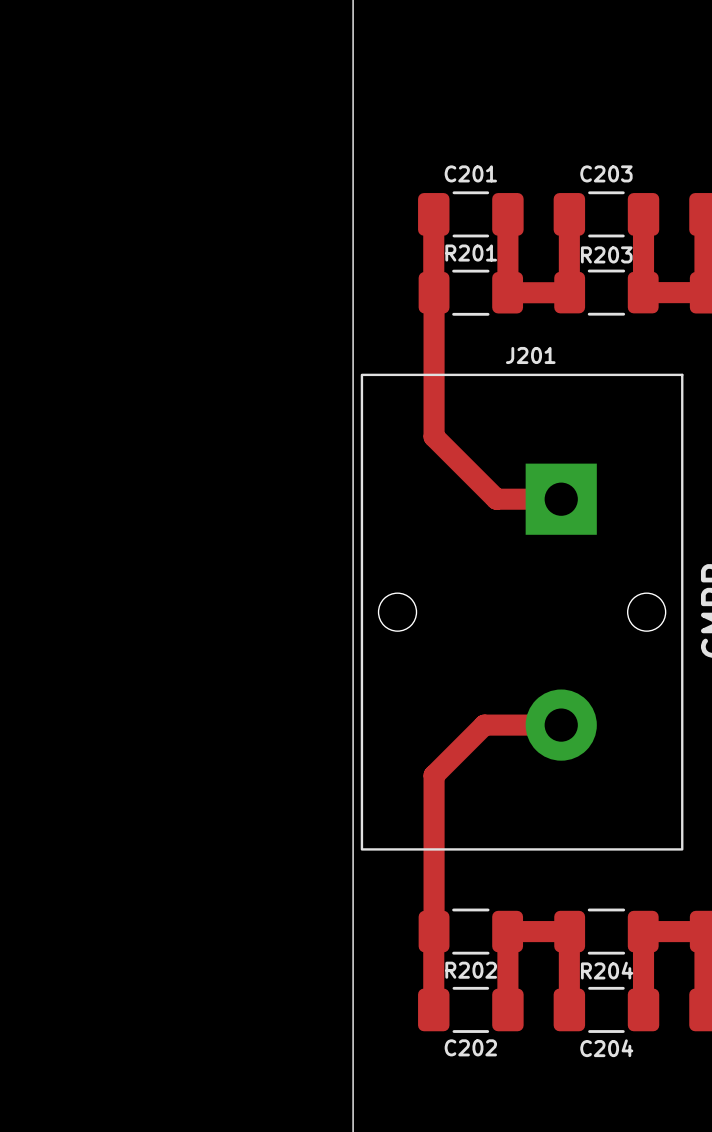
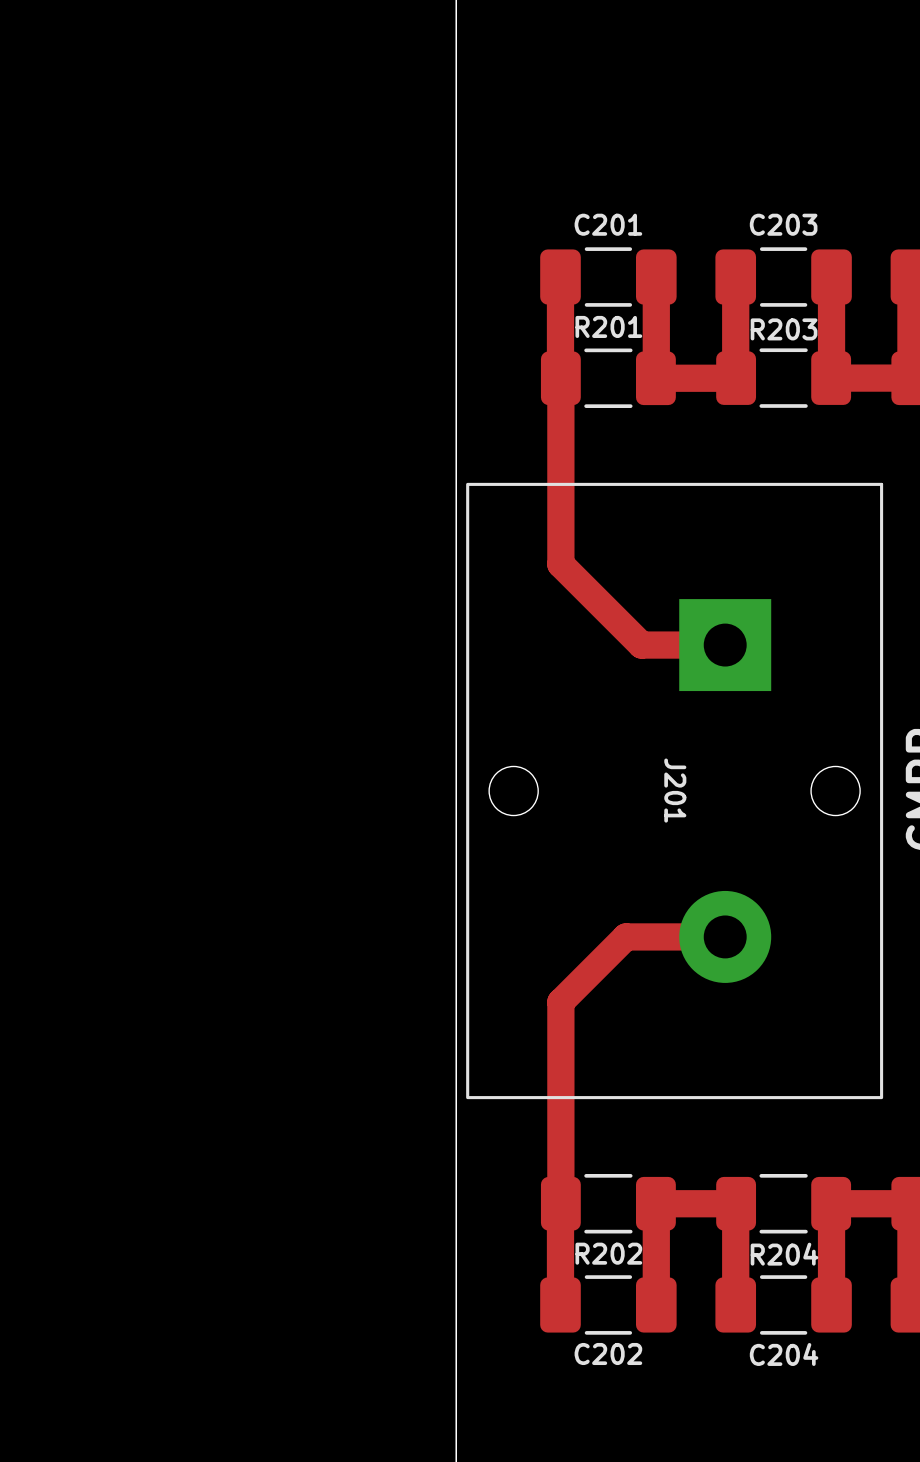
J201 name rotation: 0° (530, 355) -> 90° clockwise (675, 790)
J201 name position: J201 (530, 355) -> J201 (675, 790)

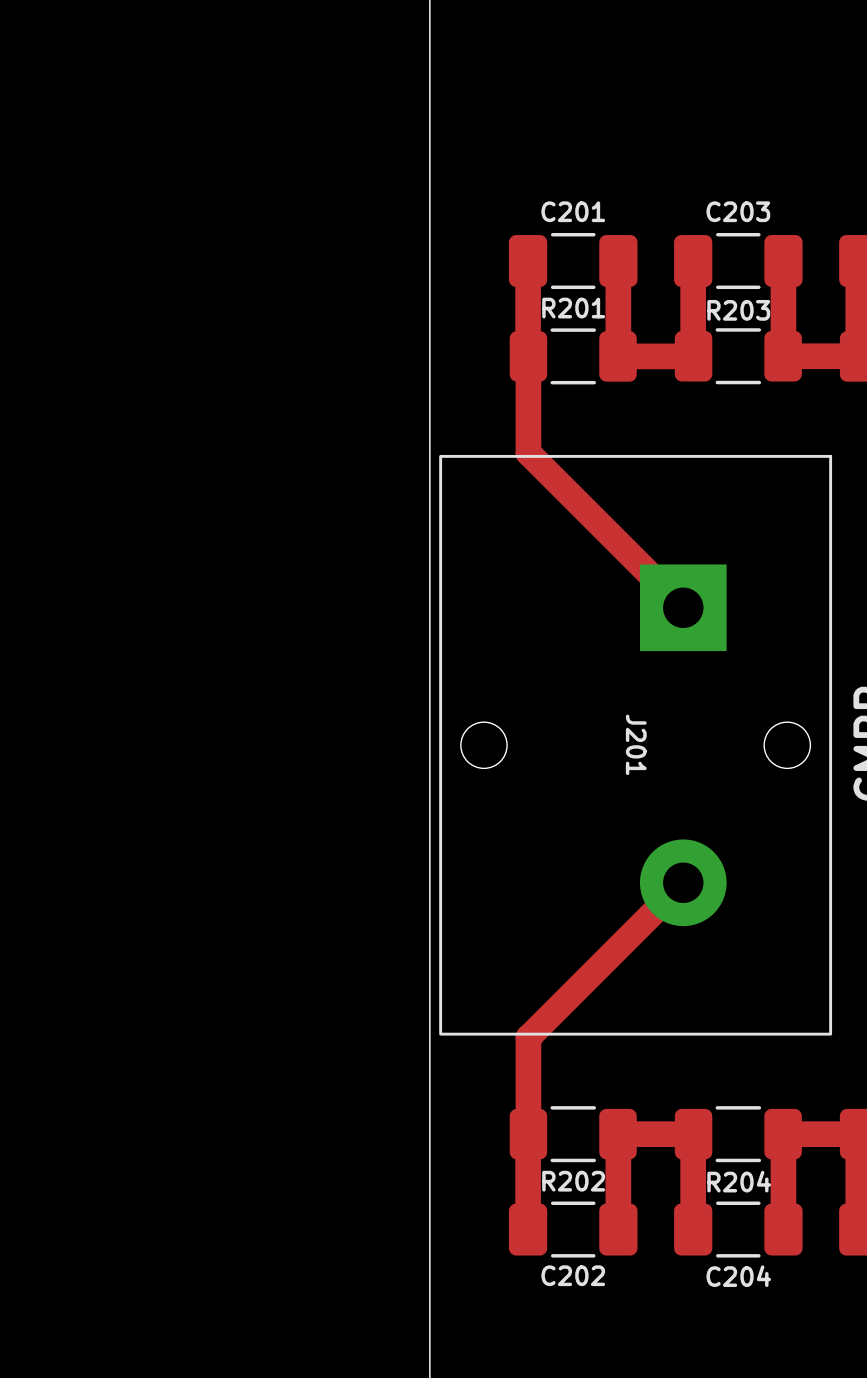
track: (560, 480) (560, 564) (641, 645) (725, 645) -> (528, 452) (683, 607)
track: (725, 936) (626, 936) (560, 1002) (560, 1101) -> (683, 882) (528, 1037)

